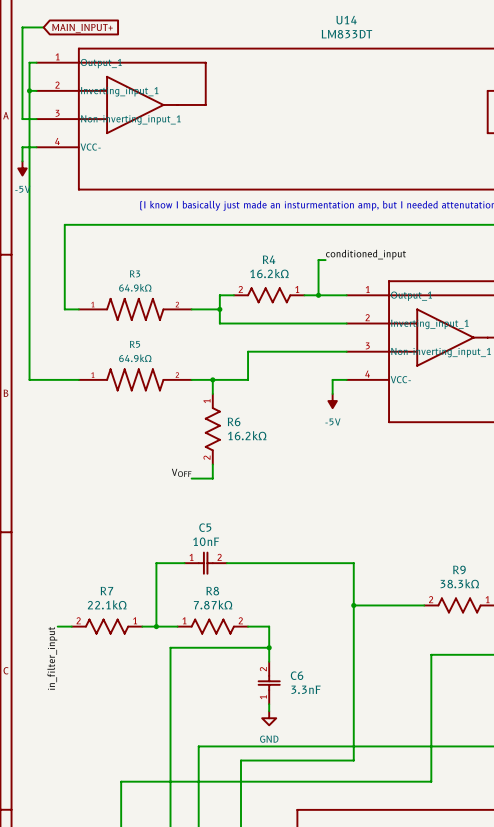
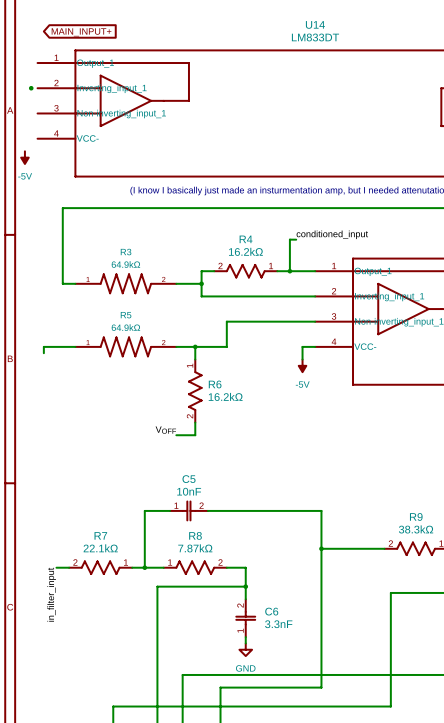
wire: (43, 27) (22, 27) (22, 119) (36, 119) -> none
wire: (36, 62) (29, 62) (29, 379) (43, 379) -> (43, 353) (43, 346)
wire: (29, 90) (36, 90) -> none
wire: (36, 147) (22, 147) (22, 161) -> none

